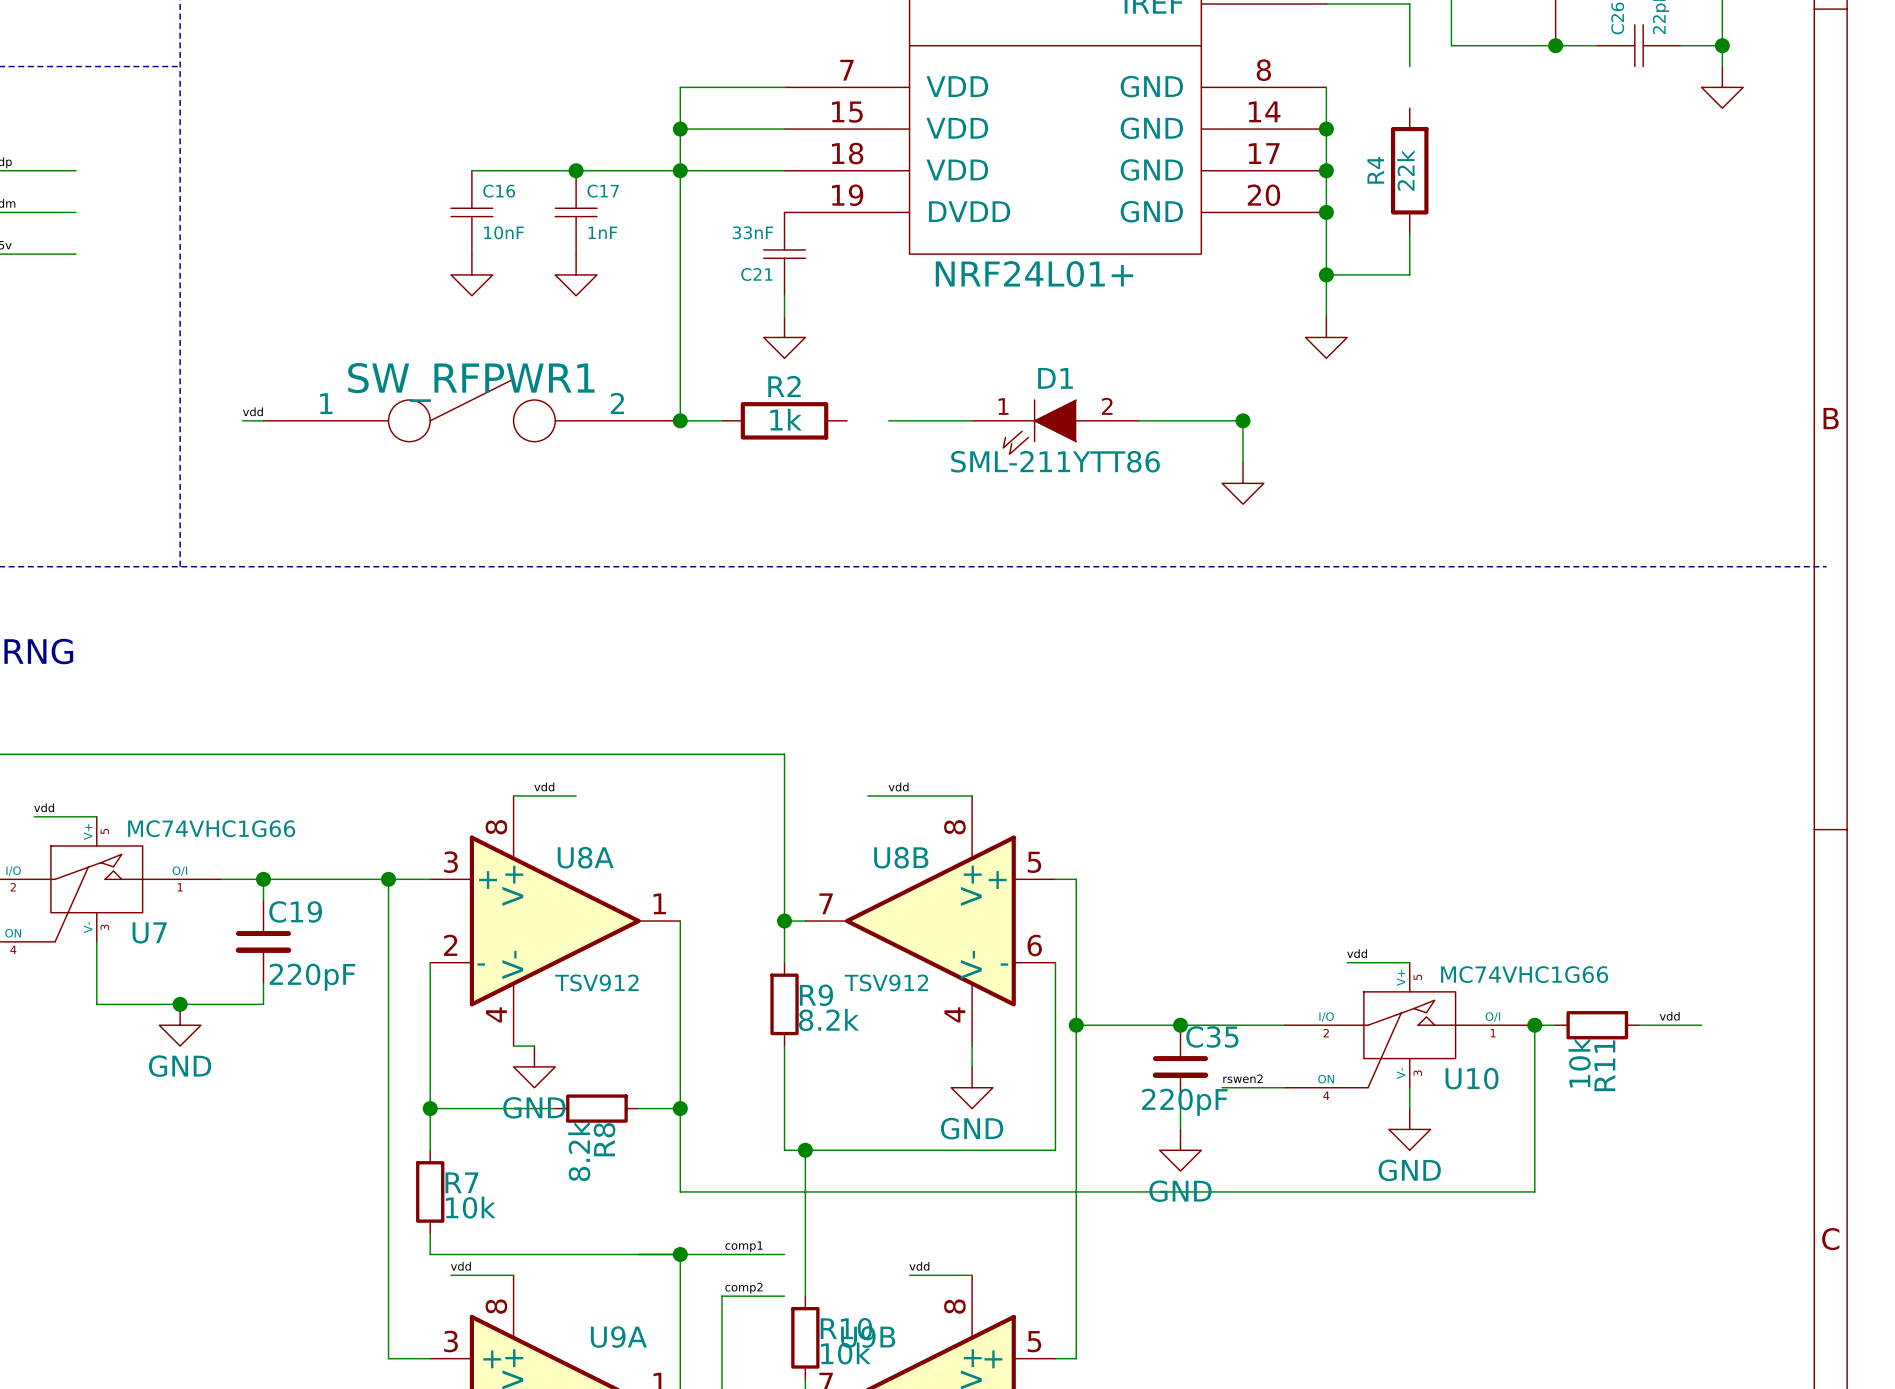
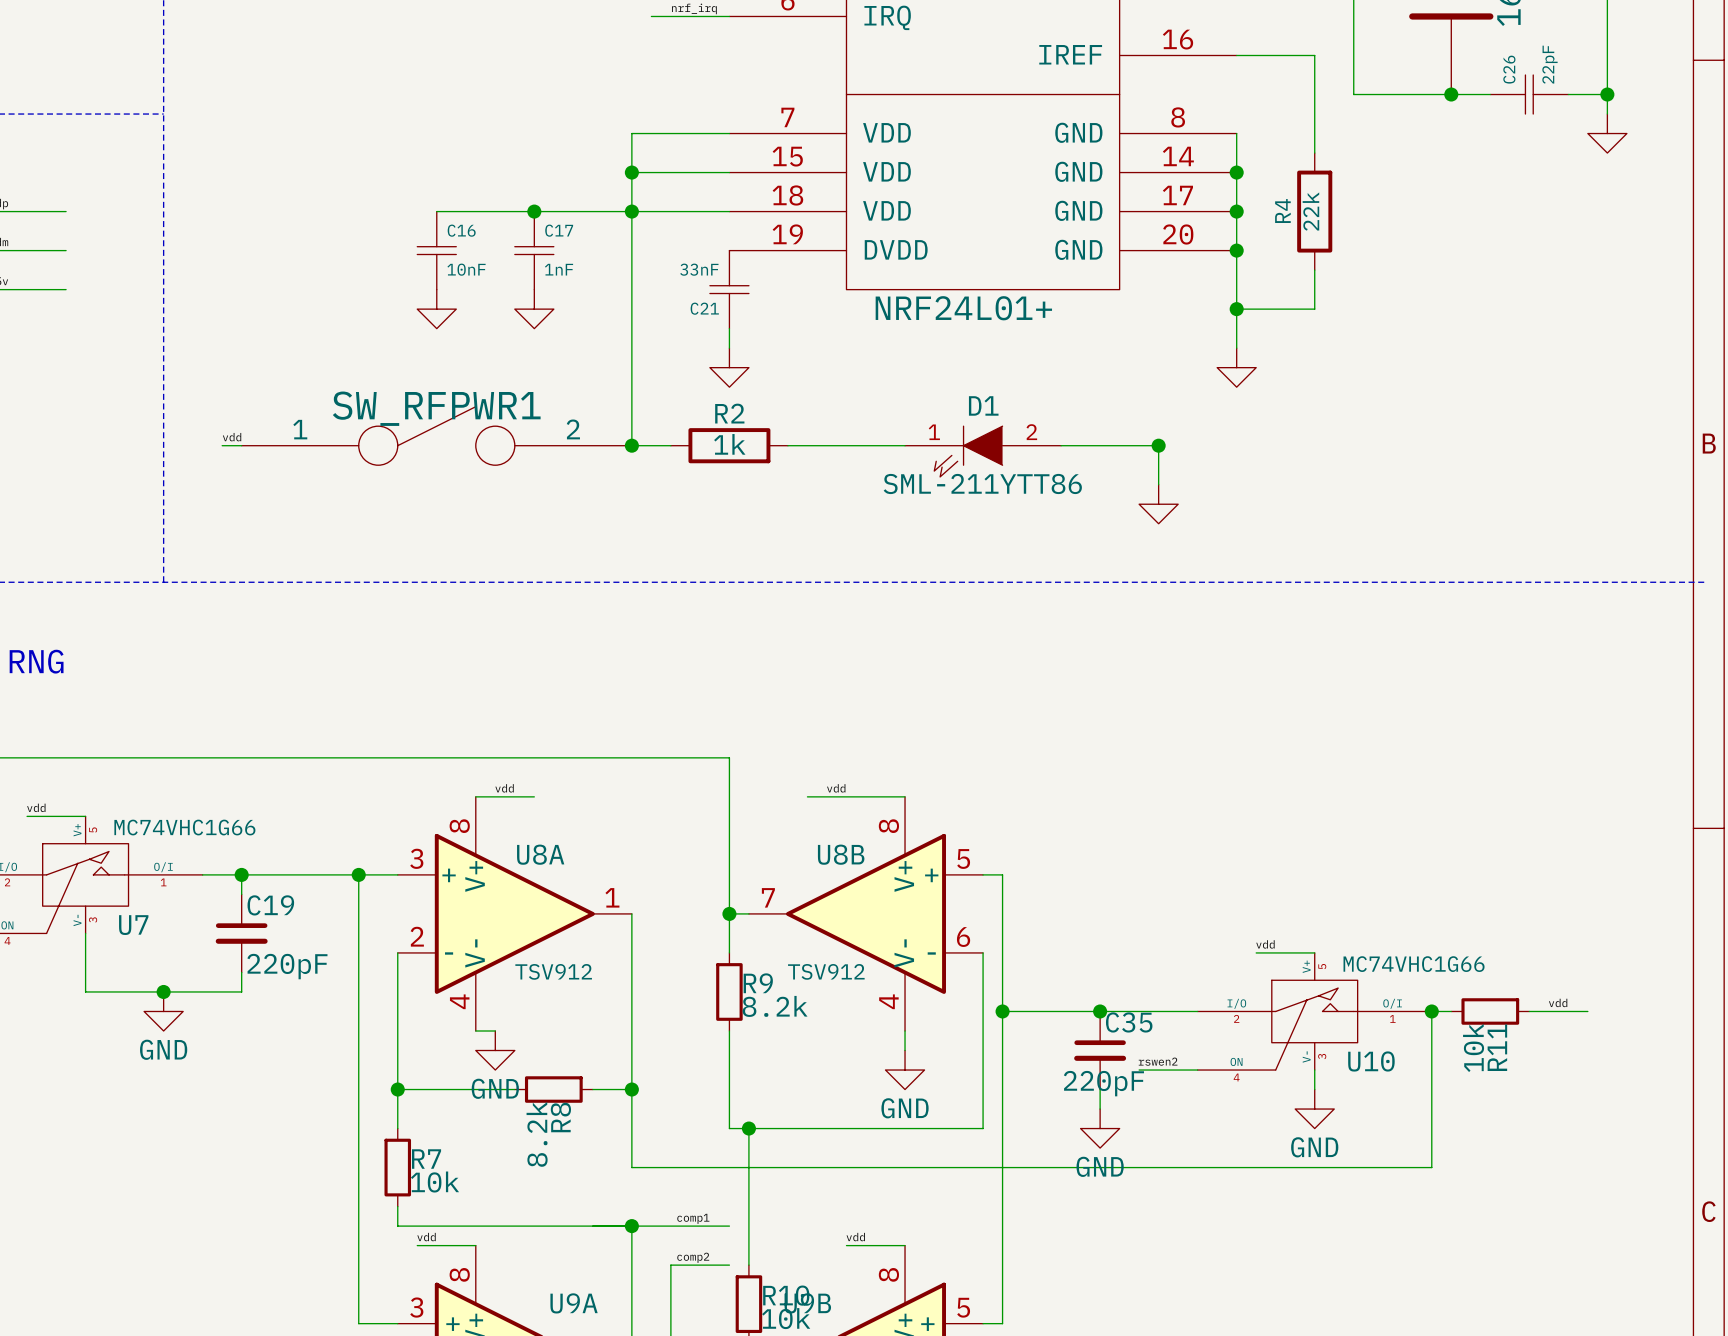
wire: none -> (1314, 114) (1314, 153)
wire: none -> (787, 445) (826, 445)

